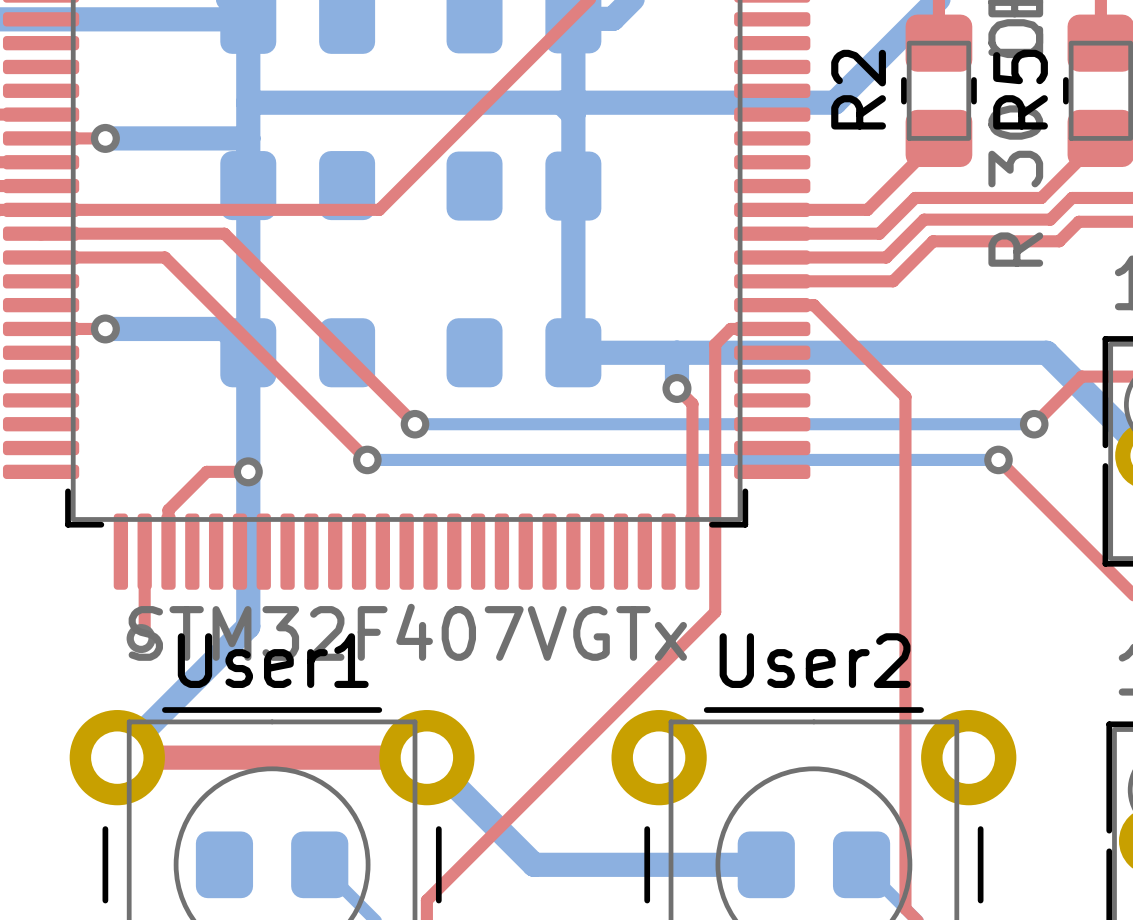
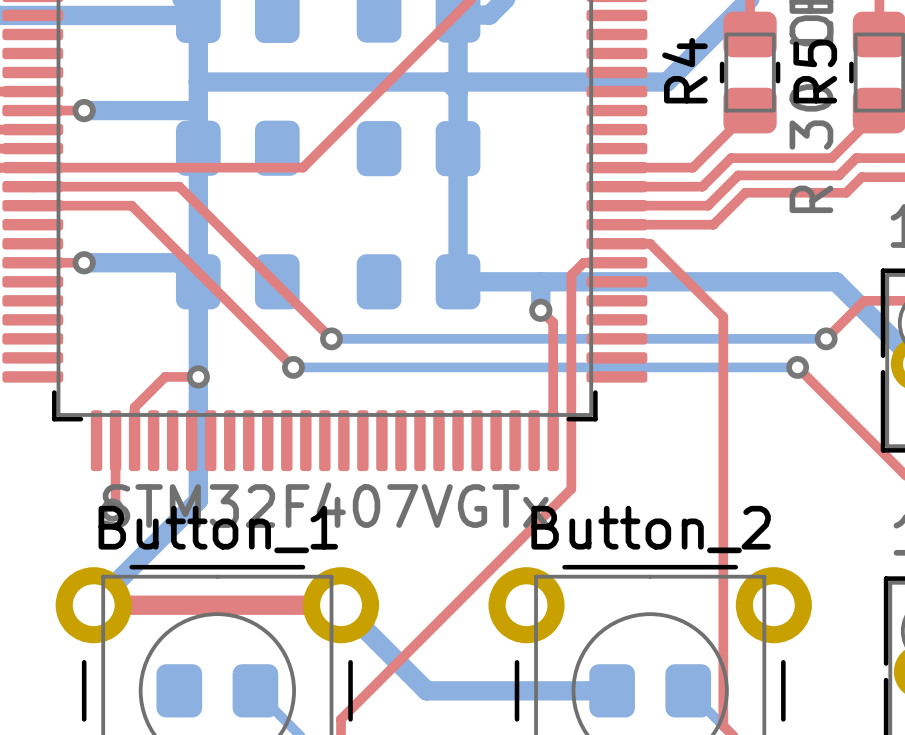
R2 name: R2 (858, 89) -> R4 (684, 70)
User1 name: User1 (273, 660) -> Button_1 (218, 529)
User2 name: User2 (815, 660) -> Button_2 (651, 529)

